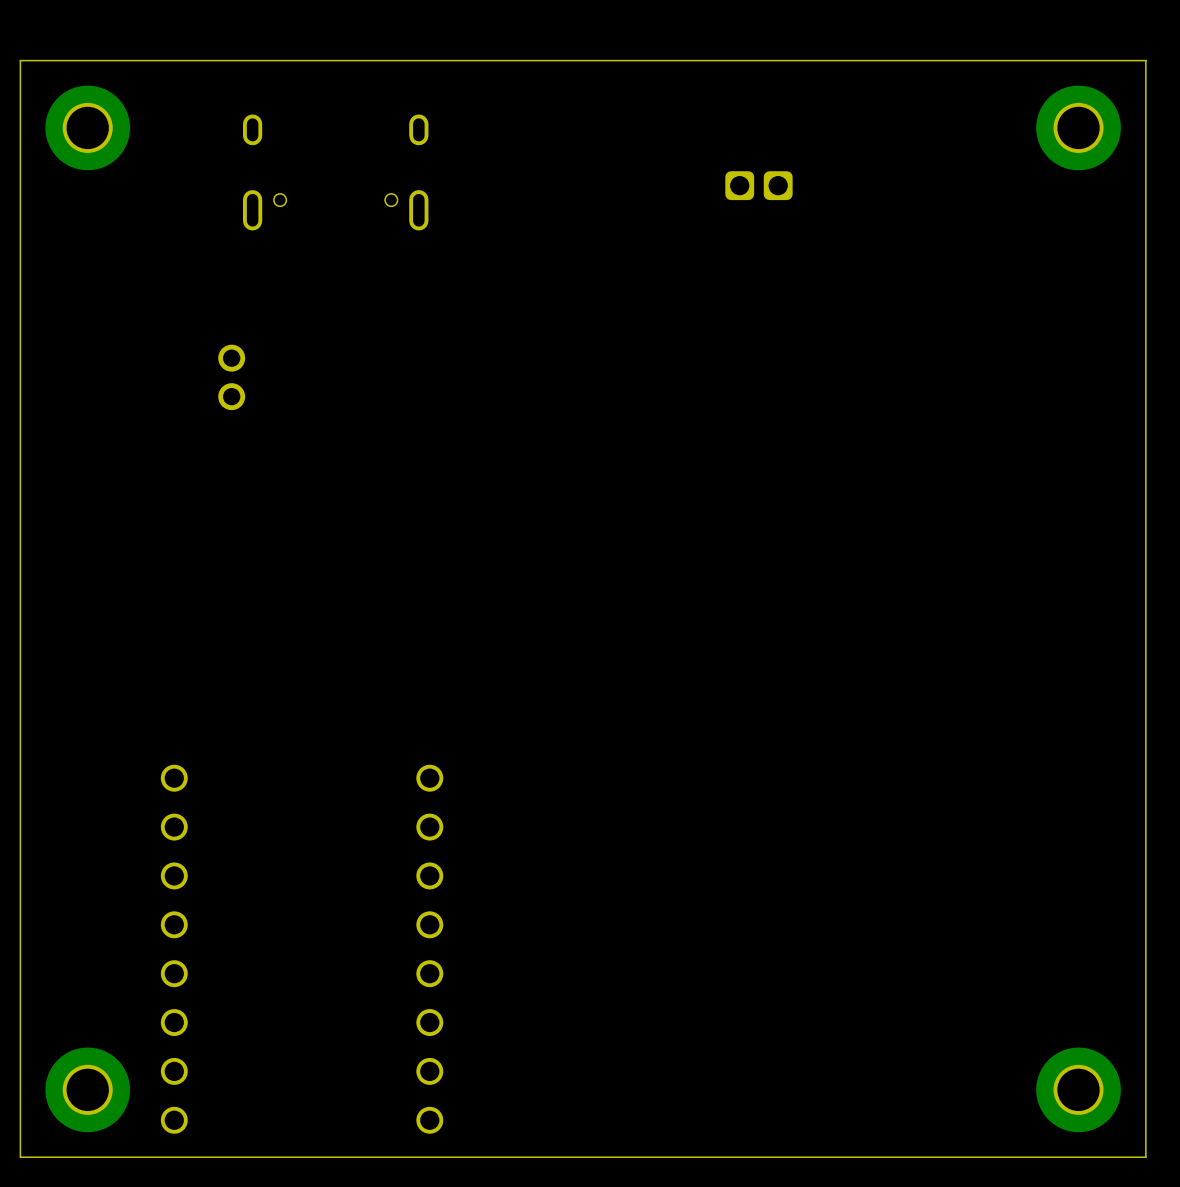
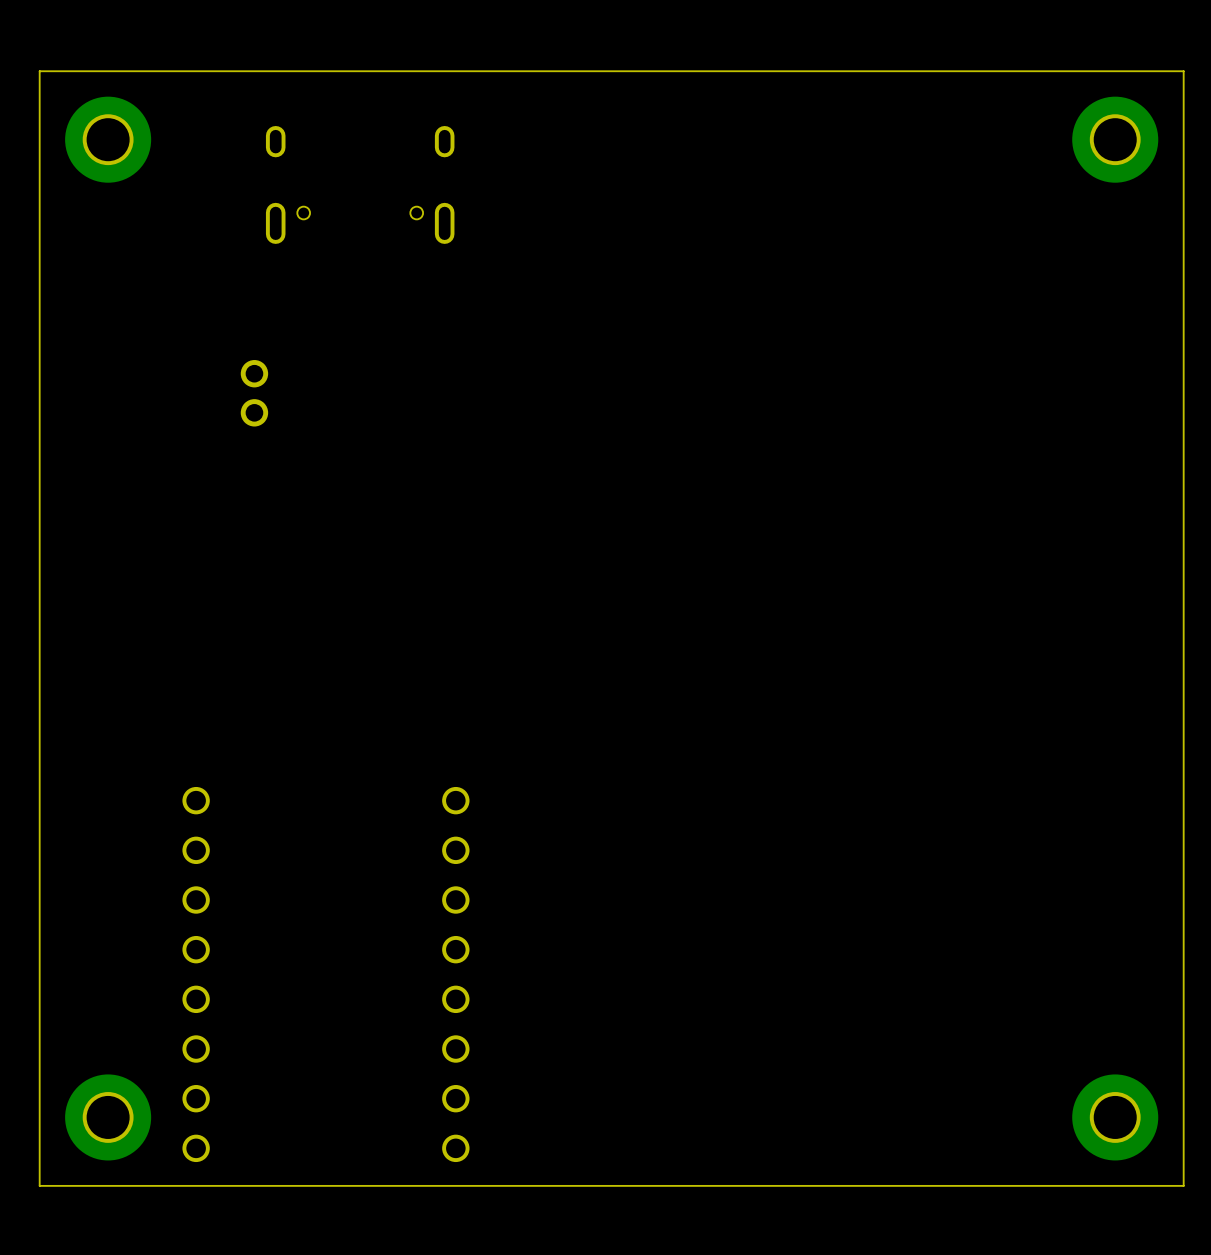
part: (758, 185) -> none

